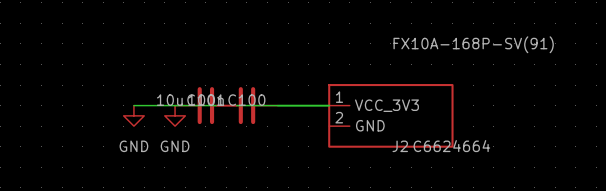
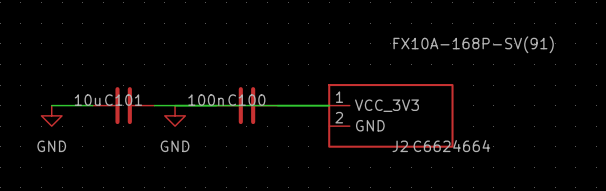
wire: none -> (51, 105) (92, 105)
C101 position: (205, 105) -> (123, 105)
power symbol position: GND (133, 115) -> GND (51, 115)

